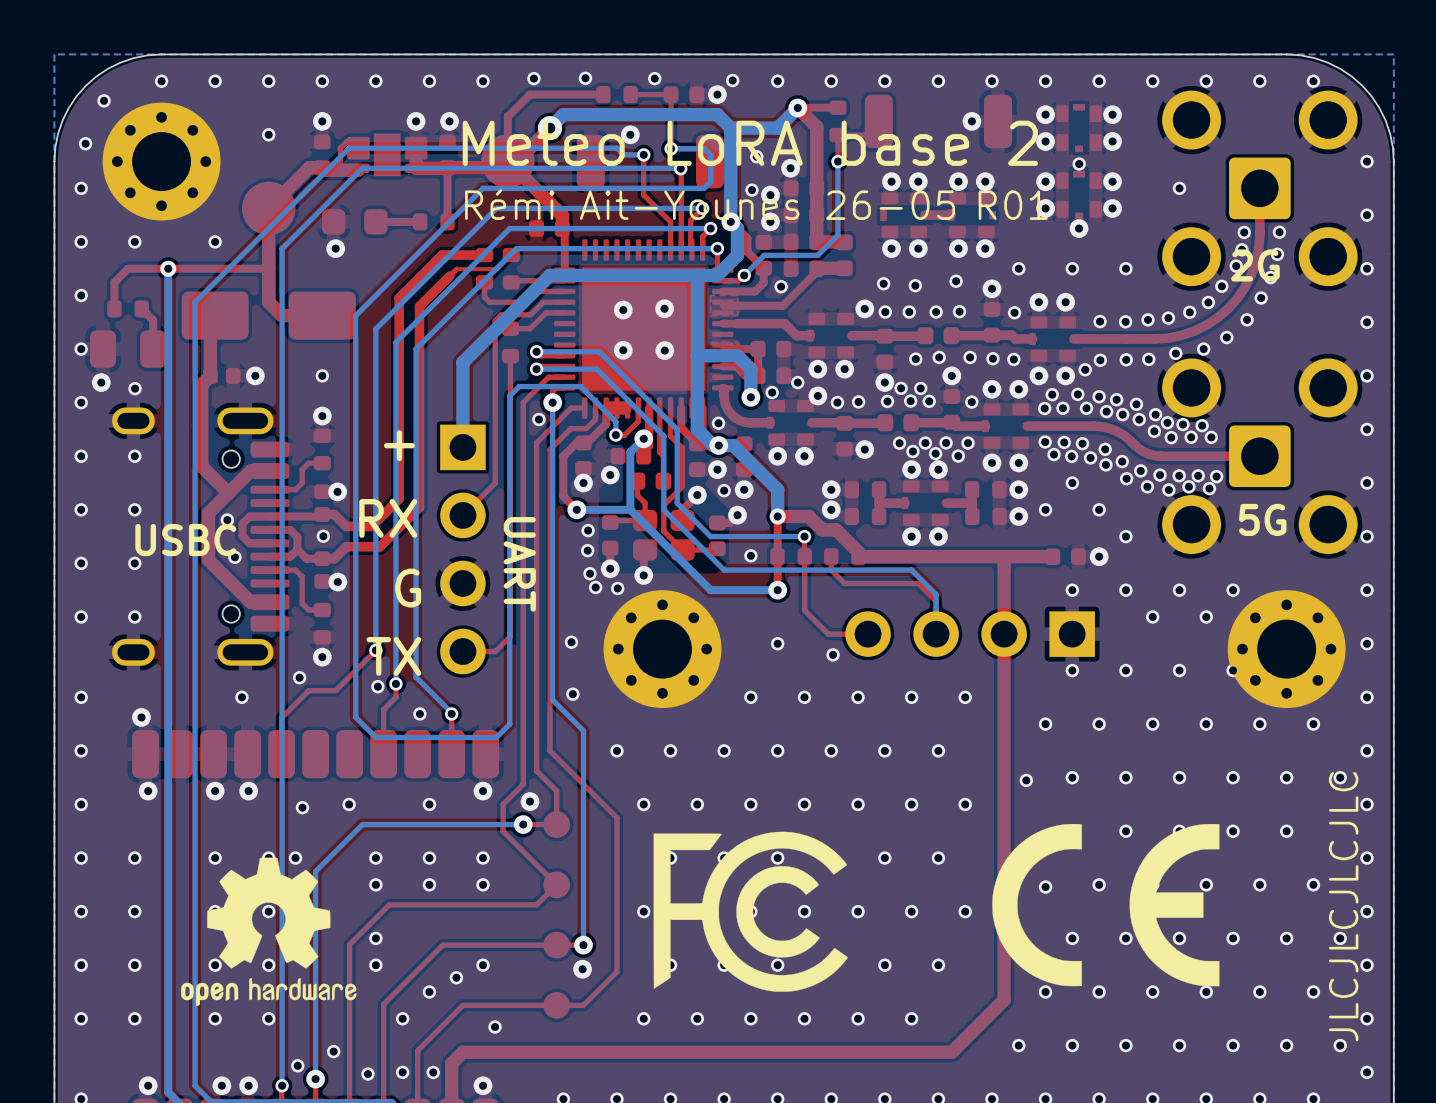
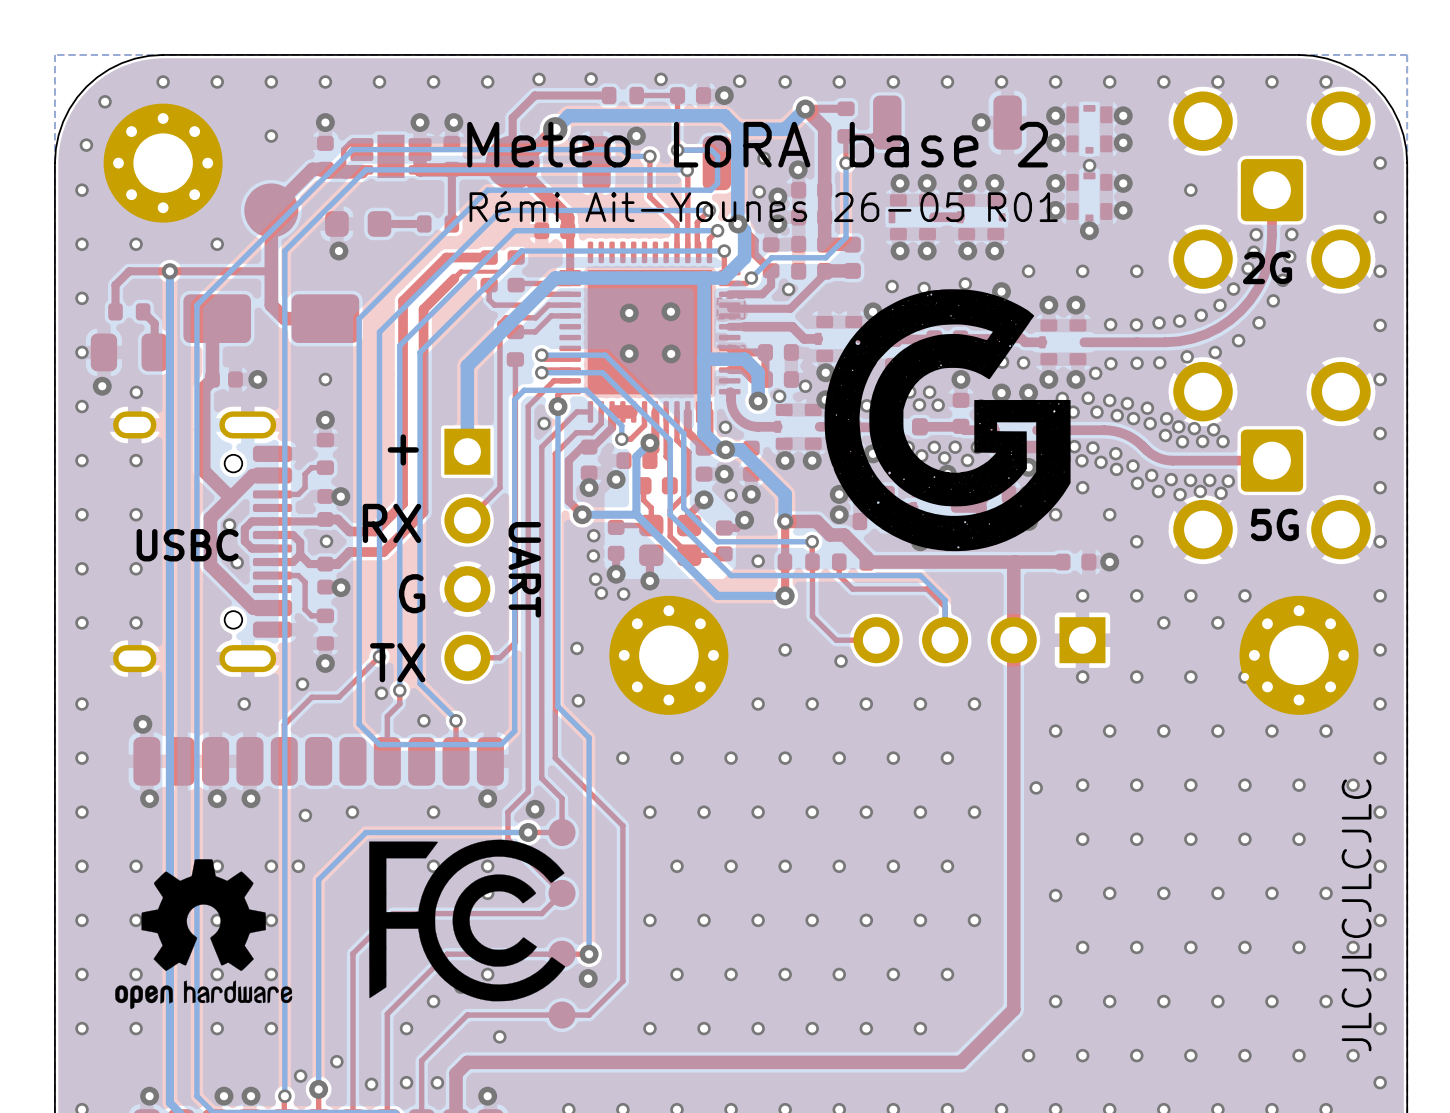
drawing: none -> [824, 289, 1071, 552]
drawing: [992, 824, 1220, 987] -> none
drawing position: (750, 911) -> (467, 920)
drawing position: (268, 931) -> (203, 934)

